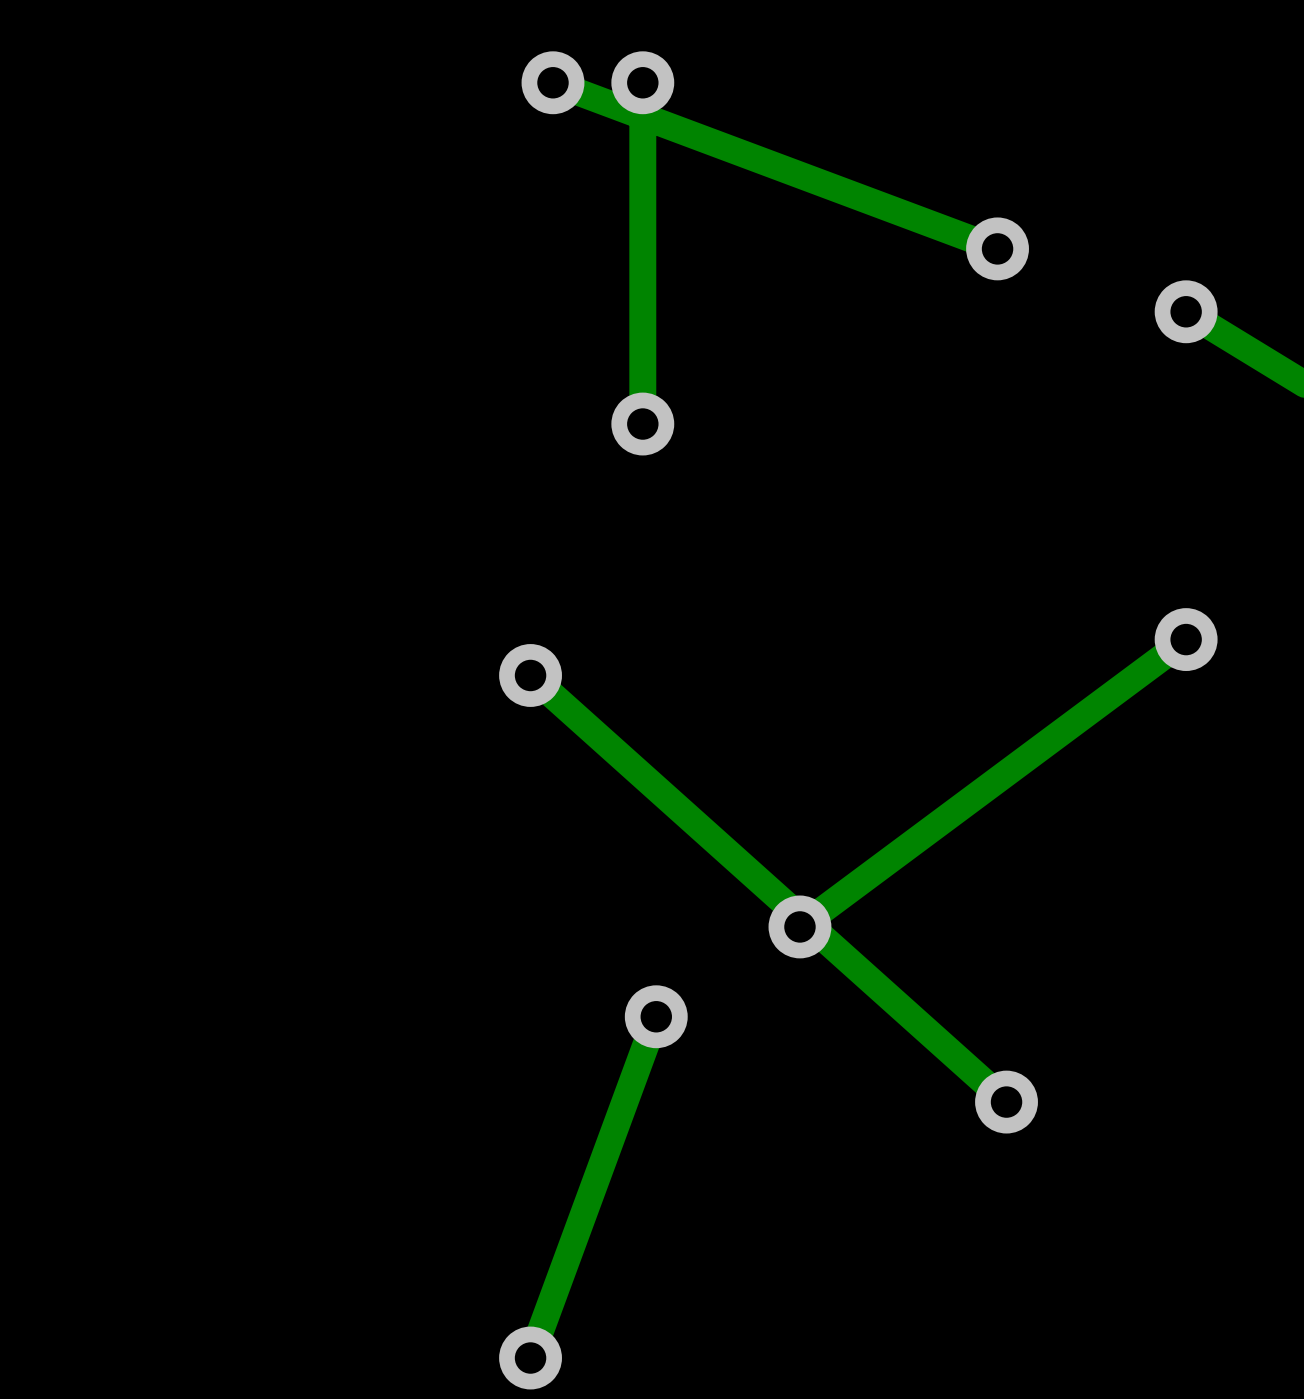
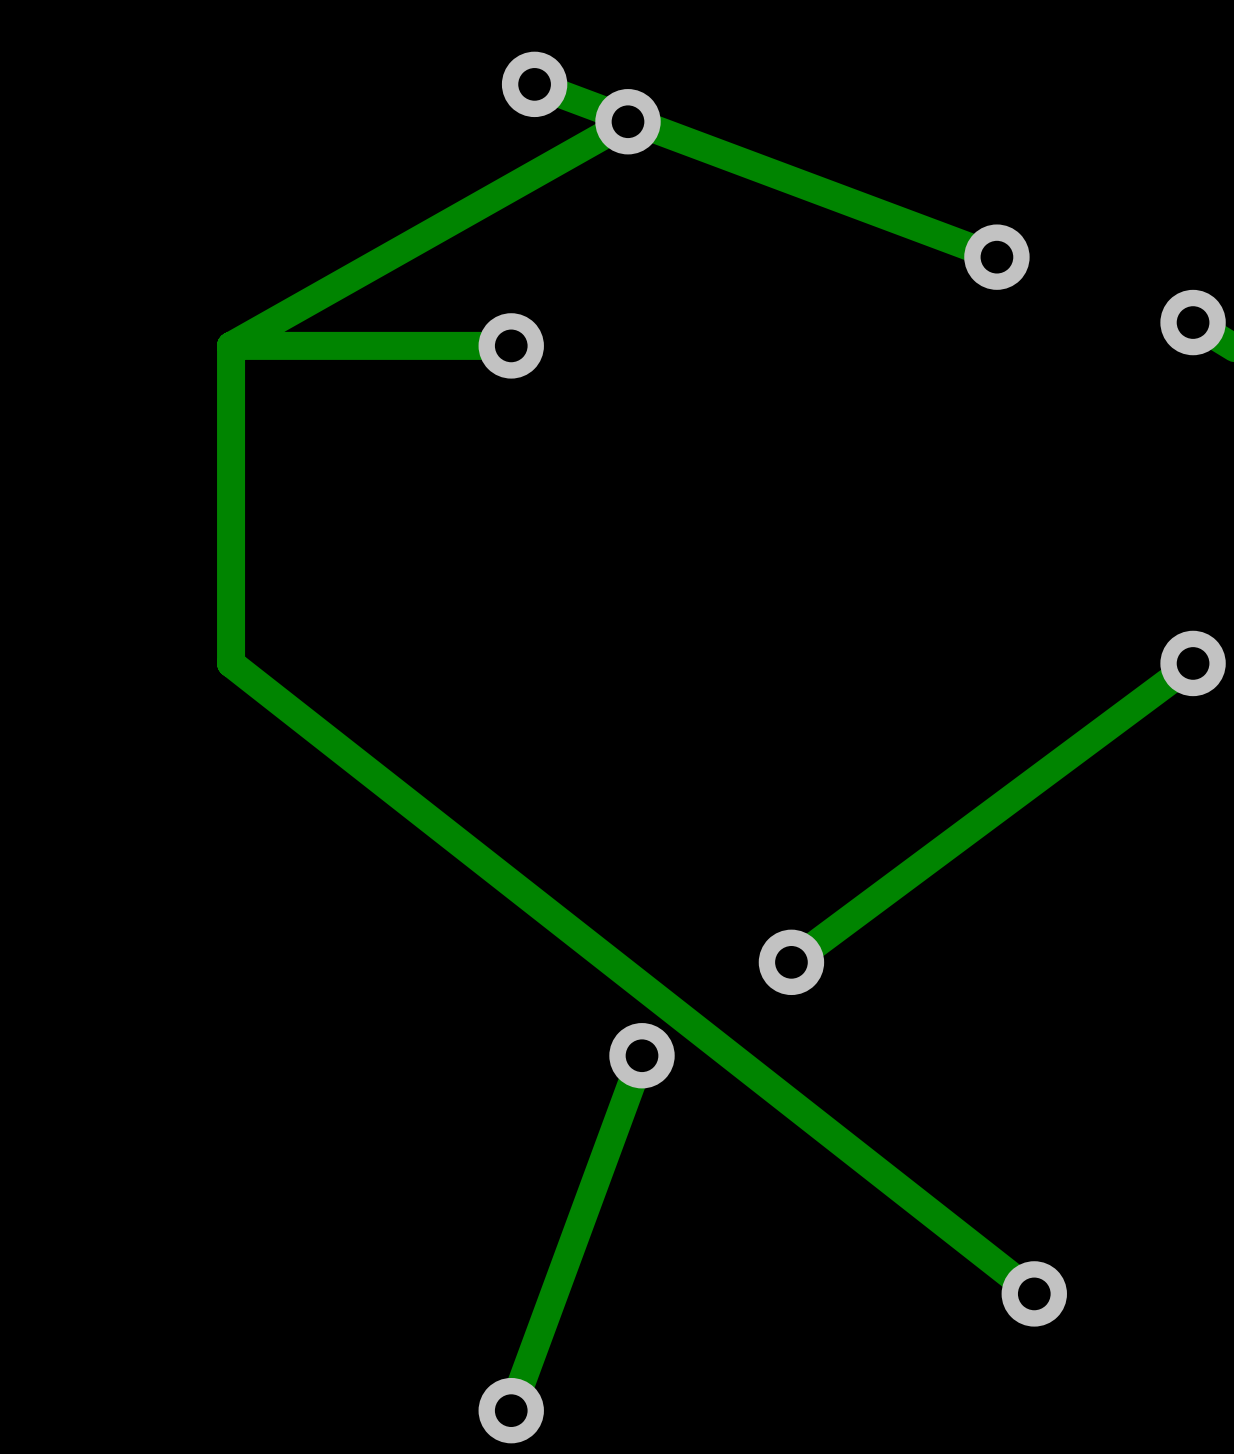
track: (642, 82) (642, 424) -> none
via position: (642, 82) -> (628, 121)
track: none -> (628, 121) (231, 345)
track: none -> (231, 345) (231, 663) (1034, 1293)
track: none -> (511, 345) (231, 345)
via: none -> (511, 345)
via: (642, 424) -> none
track: (530, 675) (1006, 1102) -> none
via: (530, 675) -> none
via position: (1006, 1102) -> (1034, 1293)

